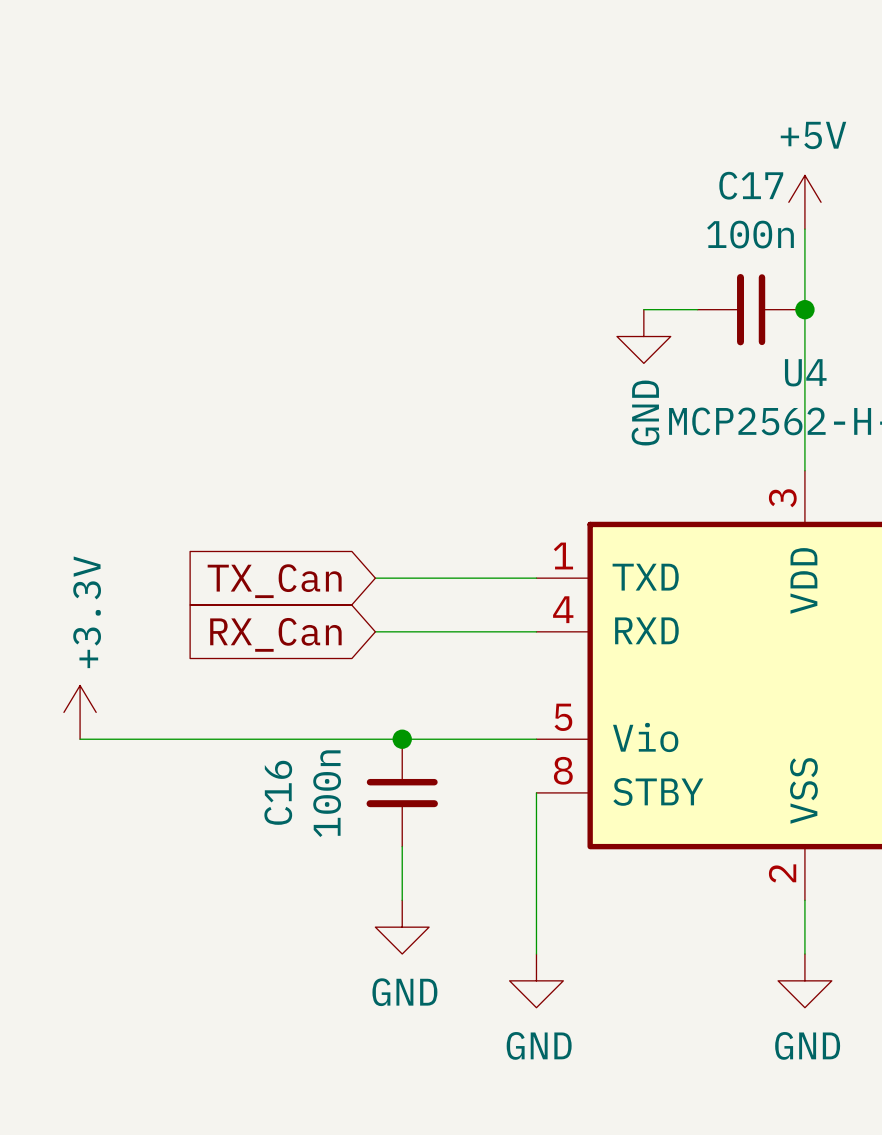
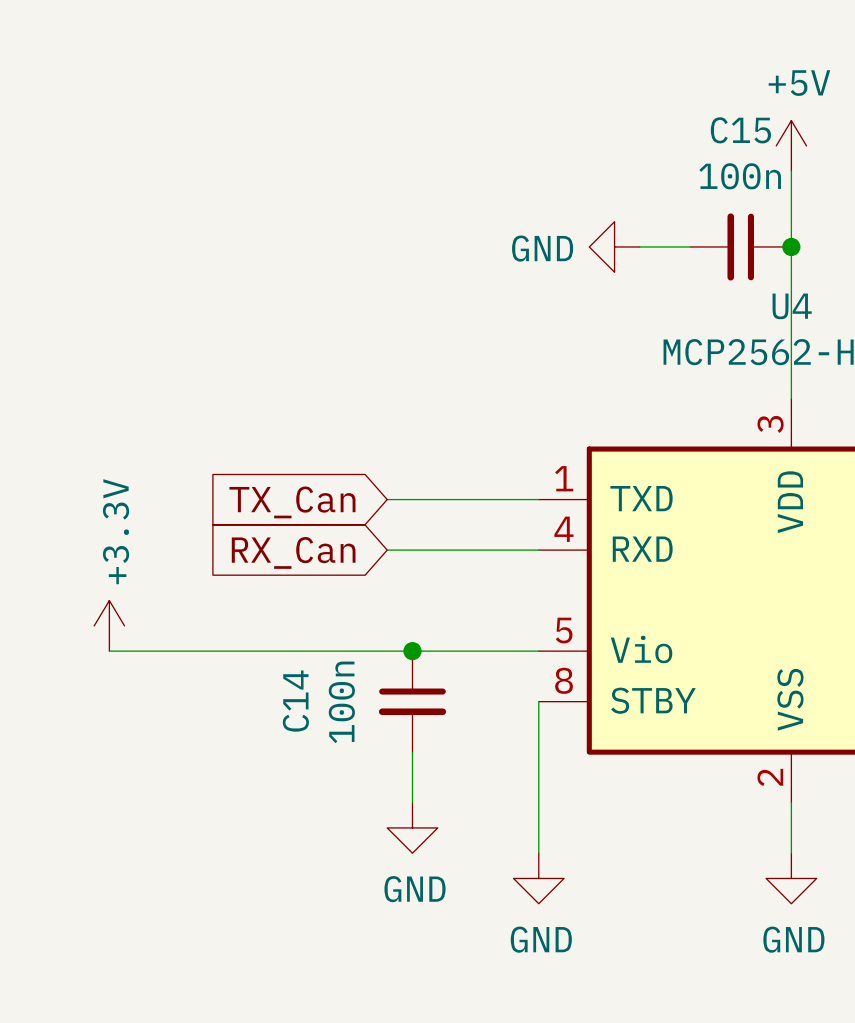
C17 name: C17 (751, 185) -> C15 (740, 130)
power symbol rotation: 0° (643, 336) -> 90° clockwise (614, 246)
power symbol position: GND (643, 336) -> GND (614, 246)
C16 name: C16 (278, 792) -> C14 (295, 701)

